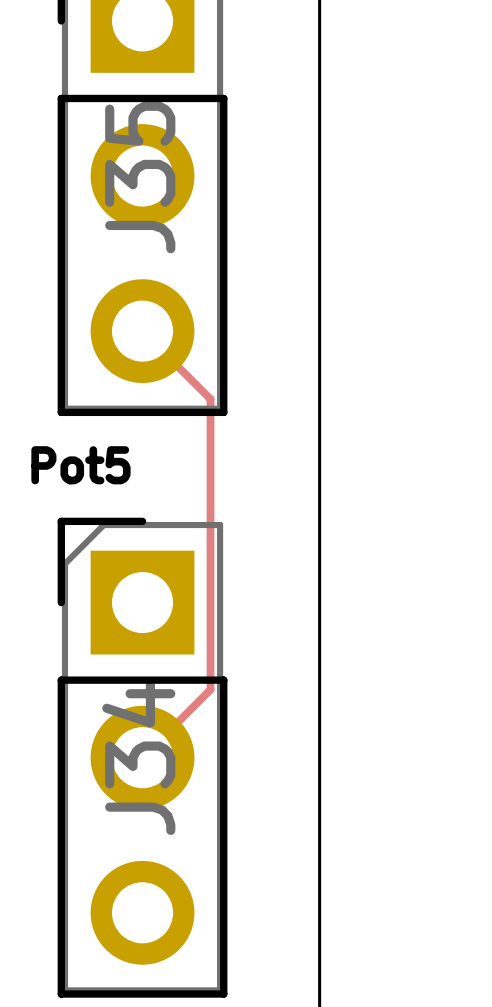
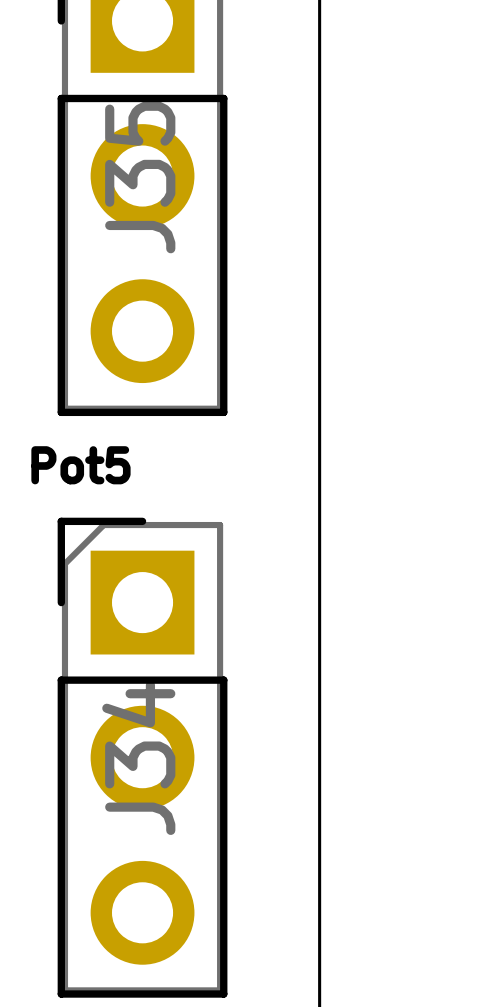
track: (142, 331) (210, 399) (210, 689) (142, 757) -> none

